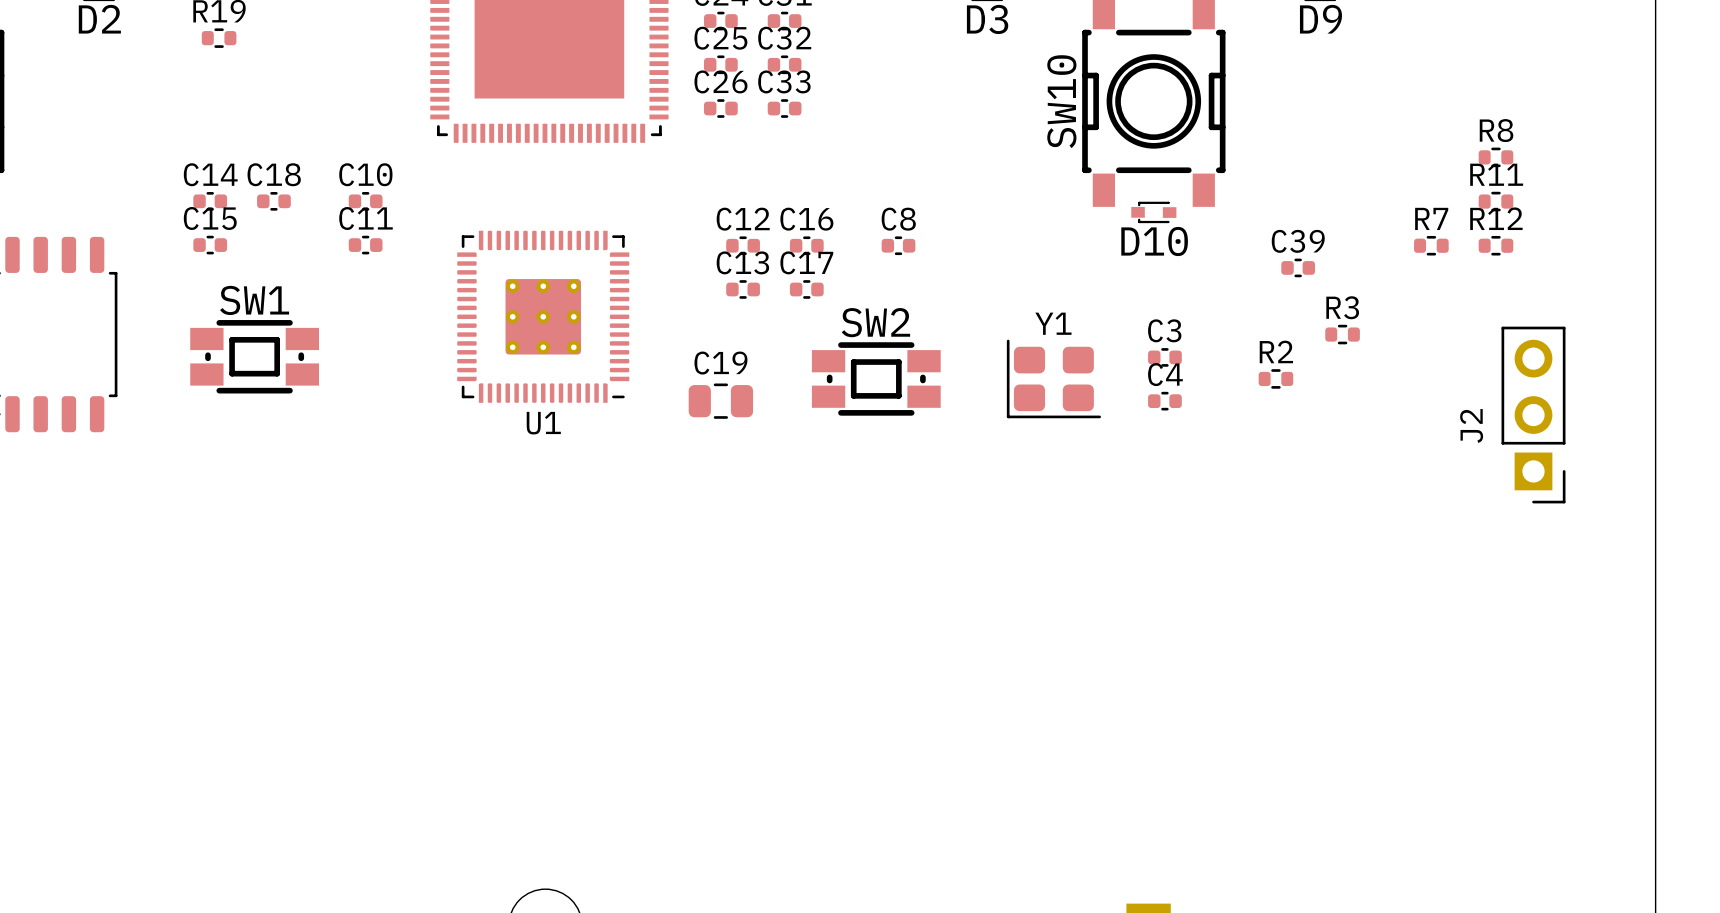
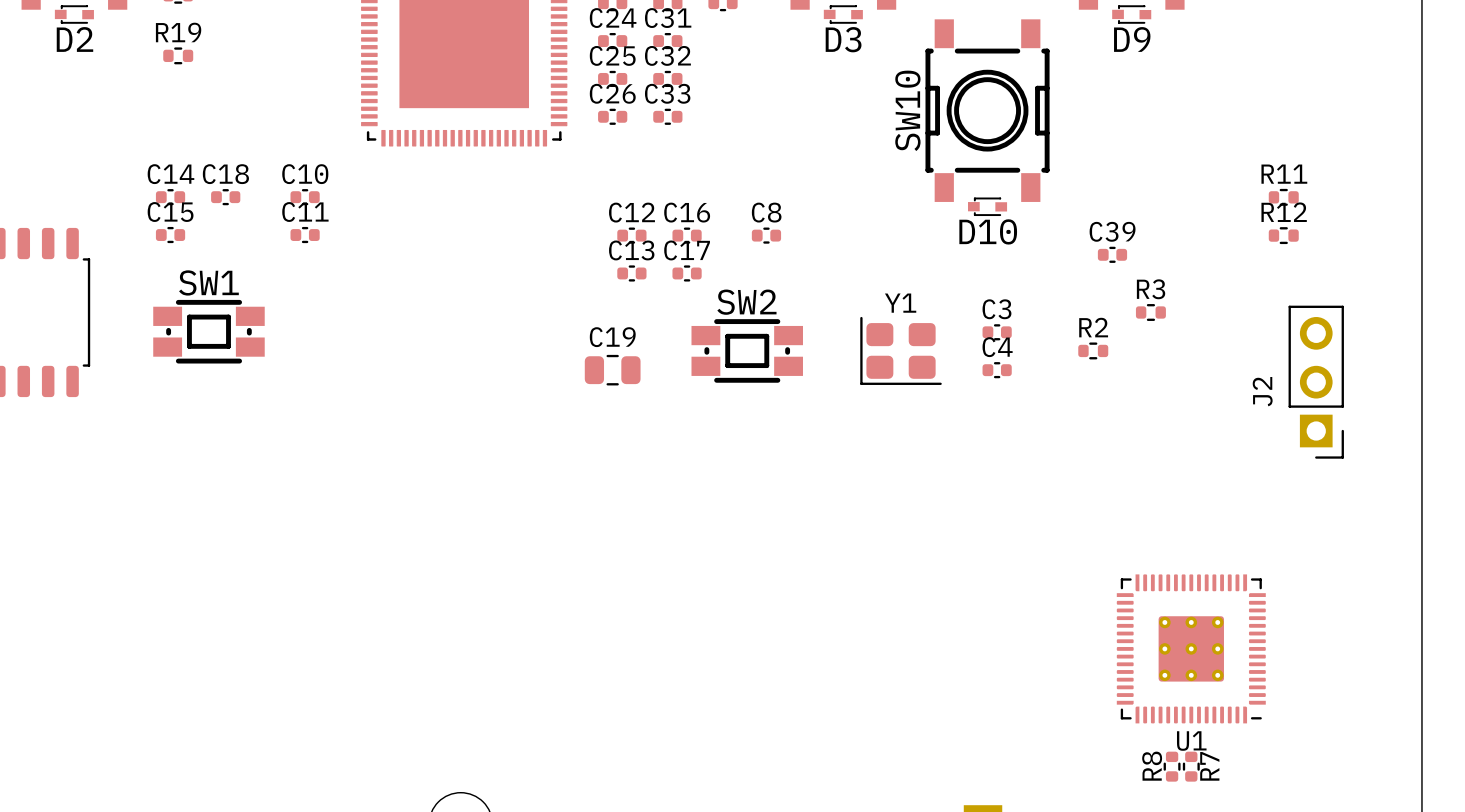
R8 rotation: 0° (1495, 157) -> 90° clockwise (1172, 766)
R8 position: (1495, 157) -> (1172, 766)
R7 rotation: 0° (1431, 245) -> 90° clockwise (1191, 766)
R7 position: (1431, 245) -> (1191, 766)
U1 position: (543, 316) -> (1191, 648)

